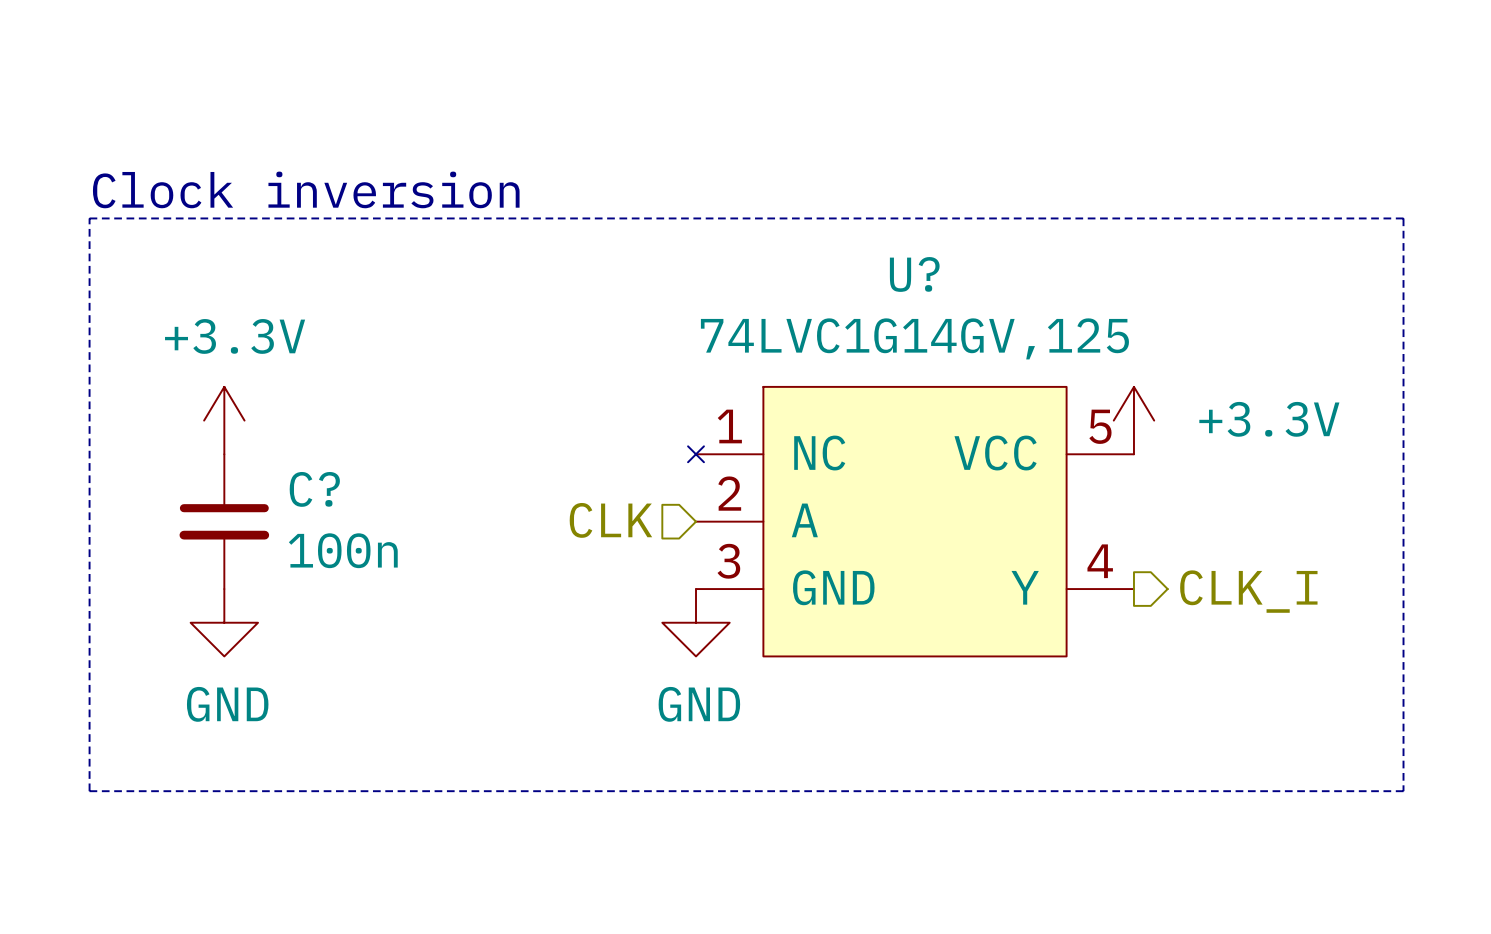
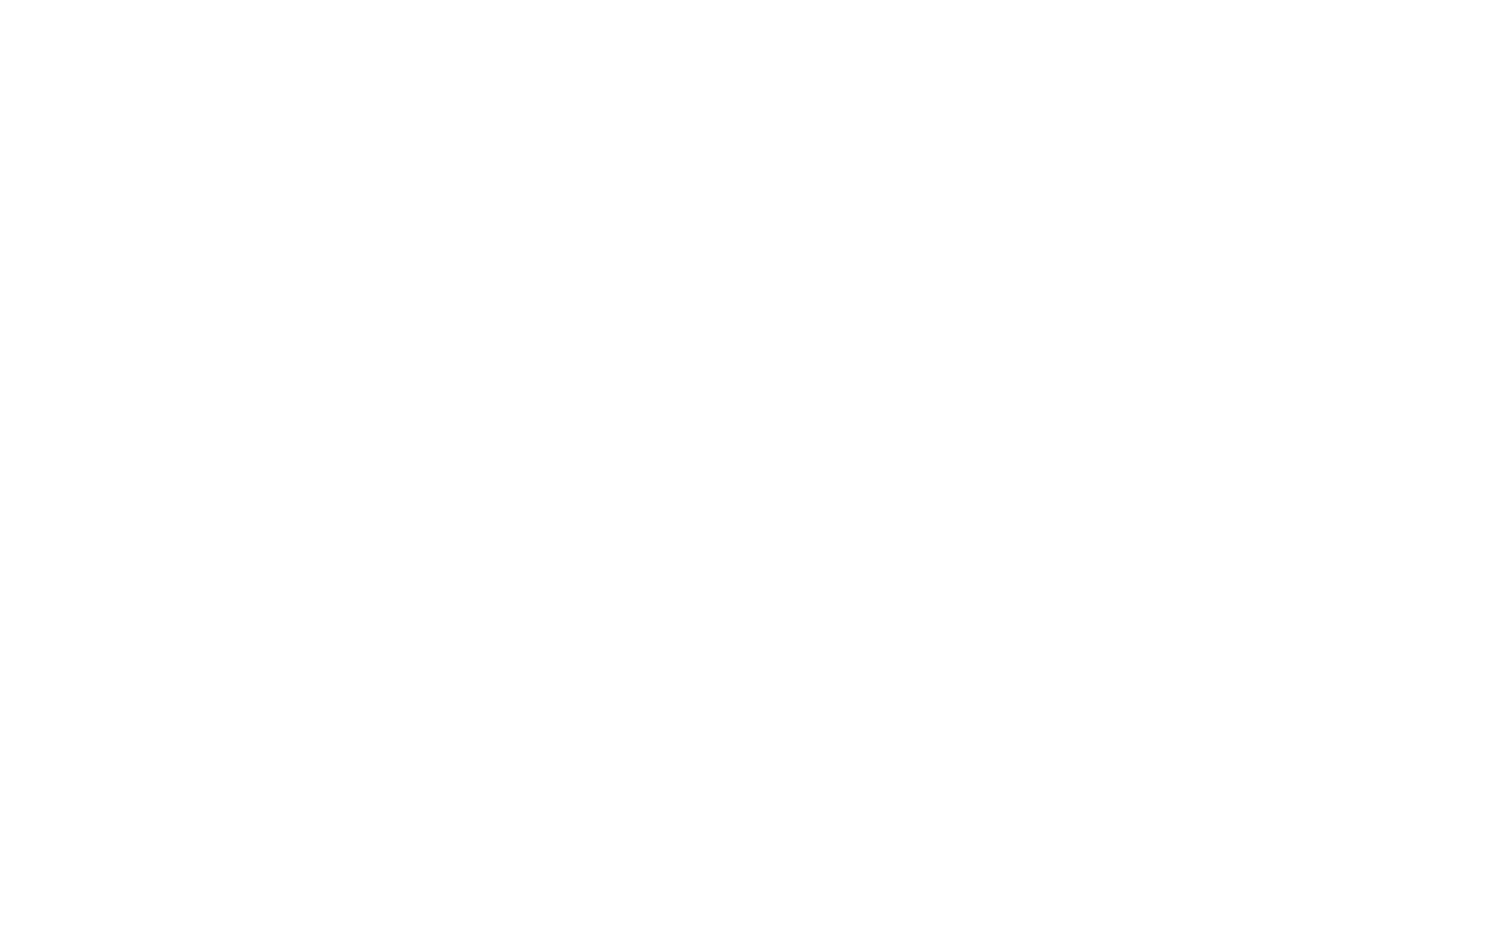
text: Clock inversion (306, 189) -> none
line: (89, 218) (1403, 218) (1403, 791) (89, 791) (89, 218) -> none
power symbol: +3.3V (224, 420) -> none
power symbol: +3.3V (1133, 420) -> none
hierarchical label: CLK (610, 520) -> none
C?: 100n (224, 521) -> none
U?: 74LVC1G14GV,125 (911, 521) -> none
hierarchical label: CLK_I (1248, 591) -> none
power symbol: GND (224, 622) -> none
power symbol: GND (696, 622) -> none

